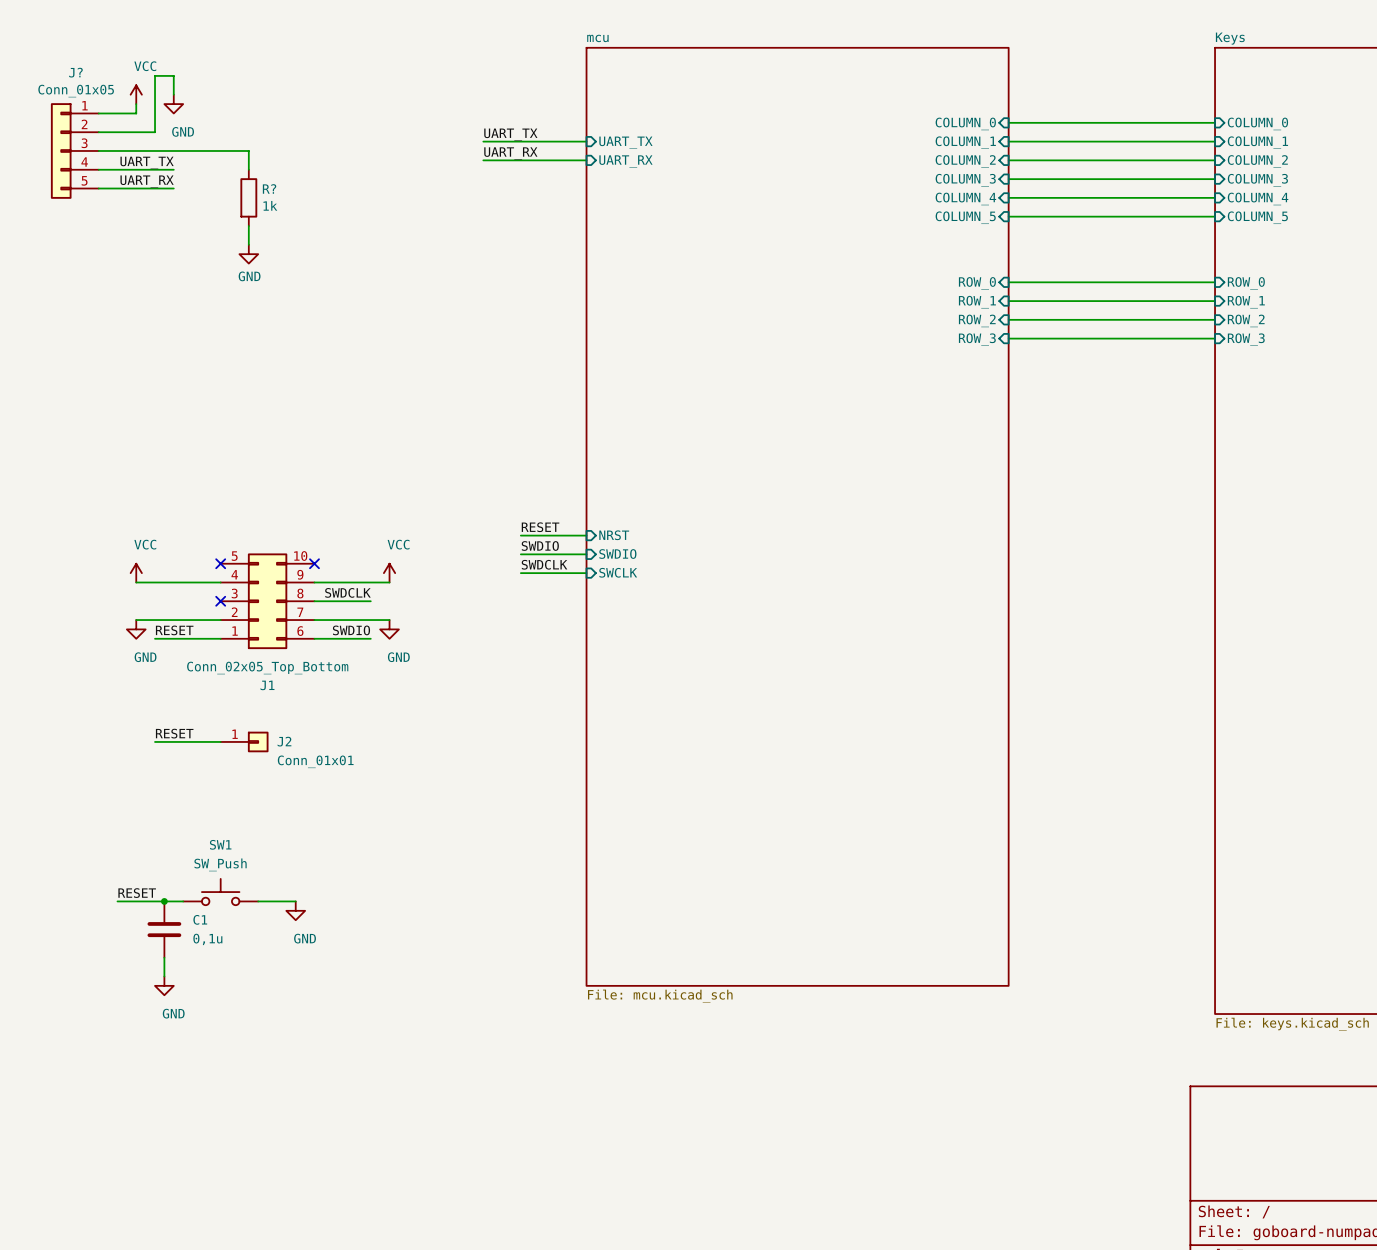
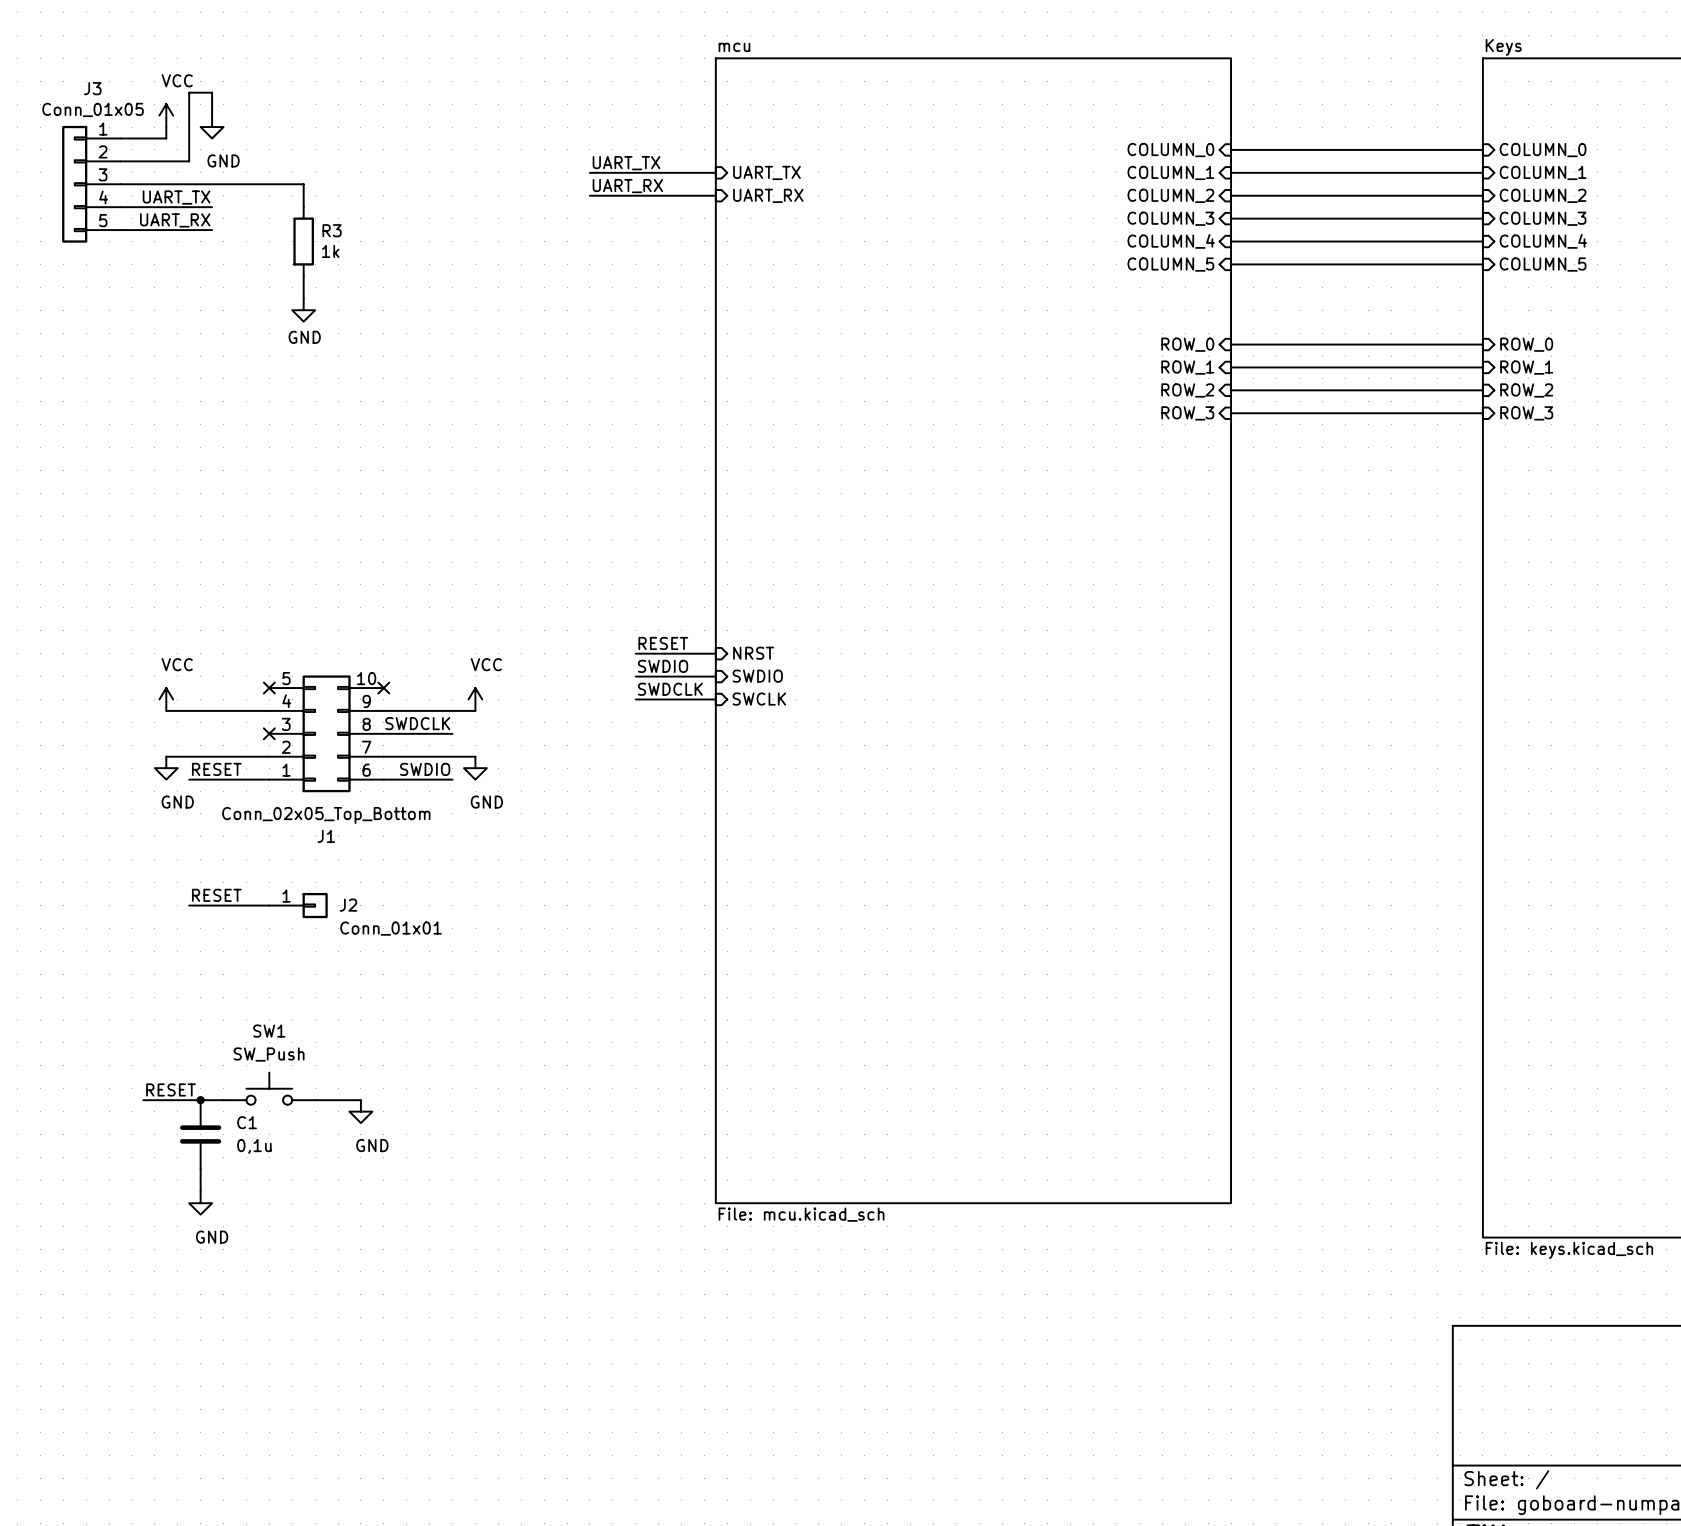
J? name: J? (75, 72) -> J3 (92, 88)
R? name: R? (269, 188) -> R3 (332, 230)

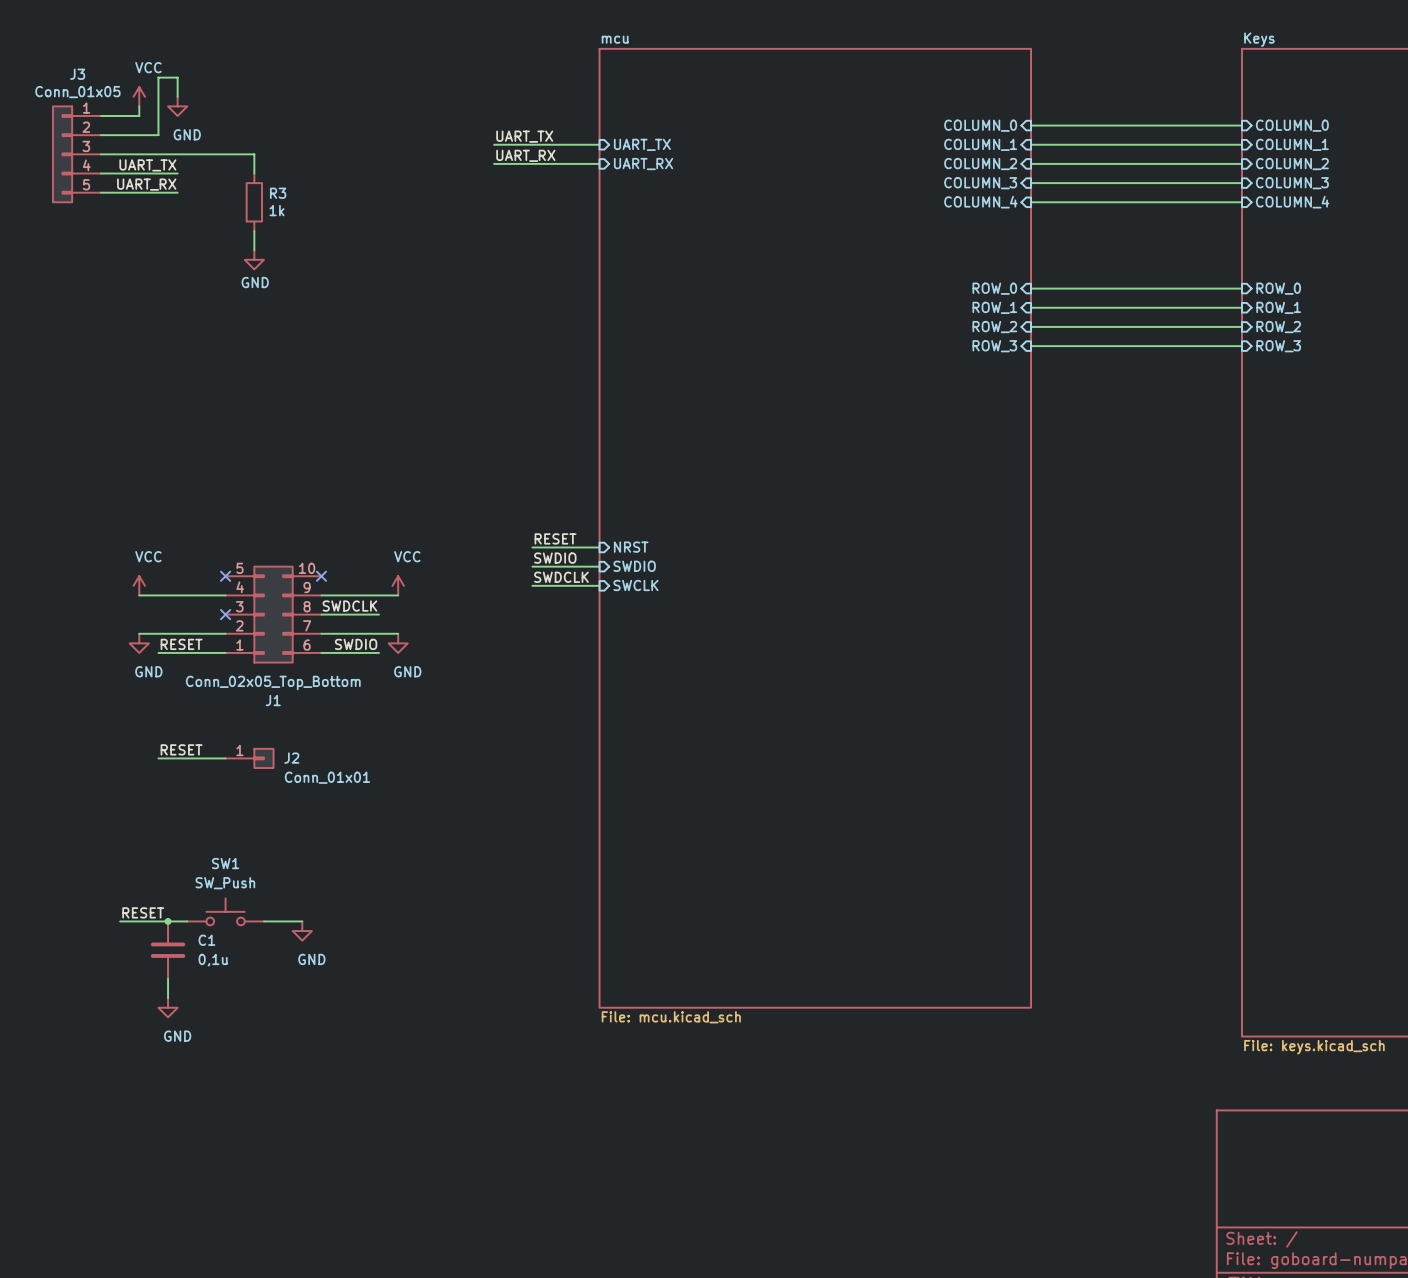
sheet pin: COLUMN_5 (1170, 264) -> none
wire: (1231, 264) (1482, 264) -> none
sheet pin: COLUMN_5 (1543, 264) -> none

